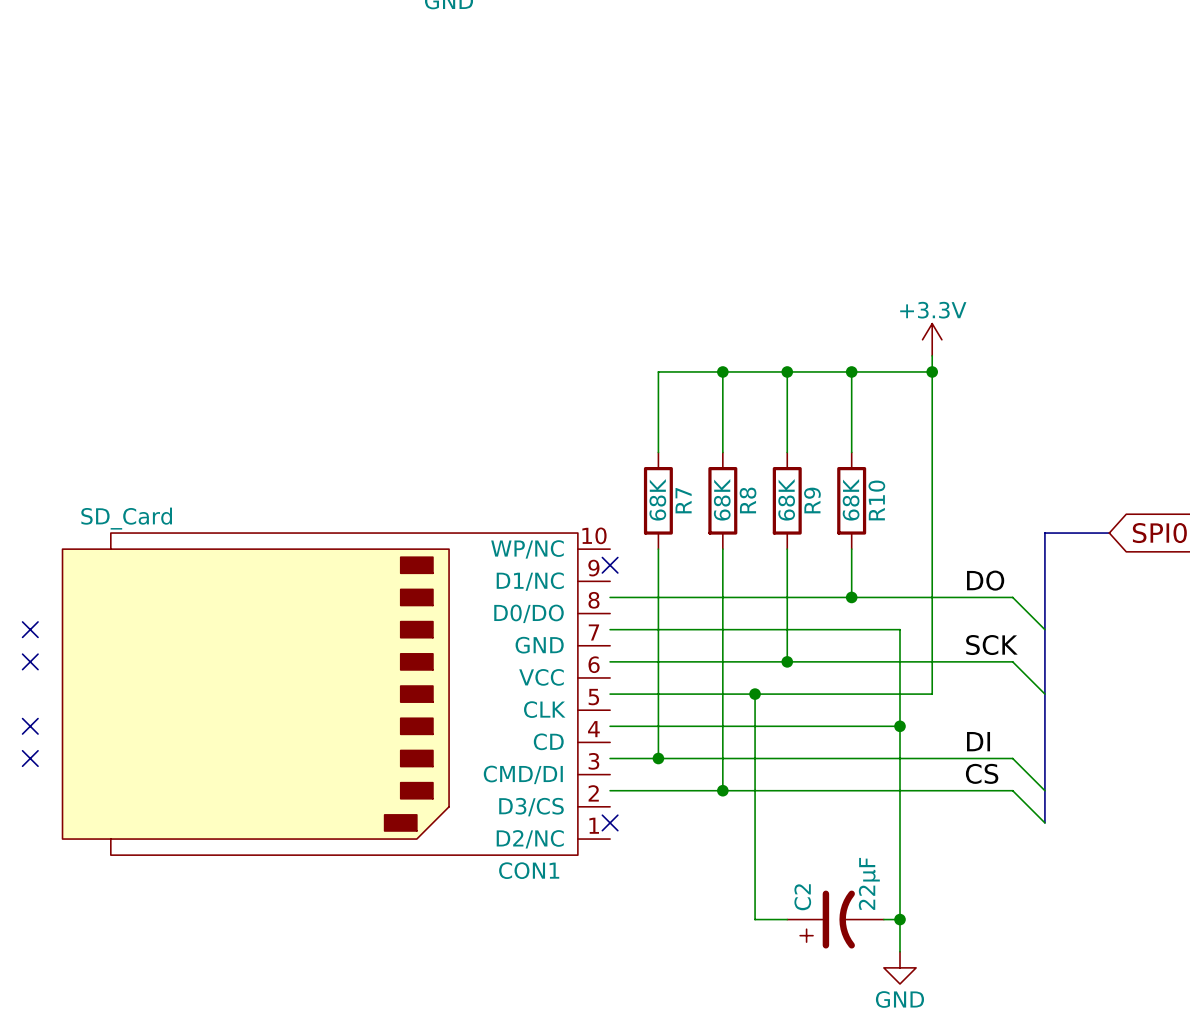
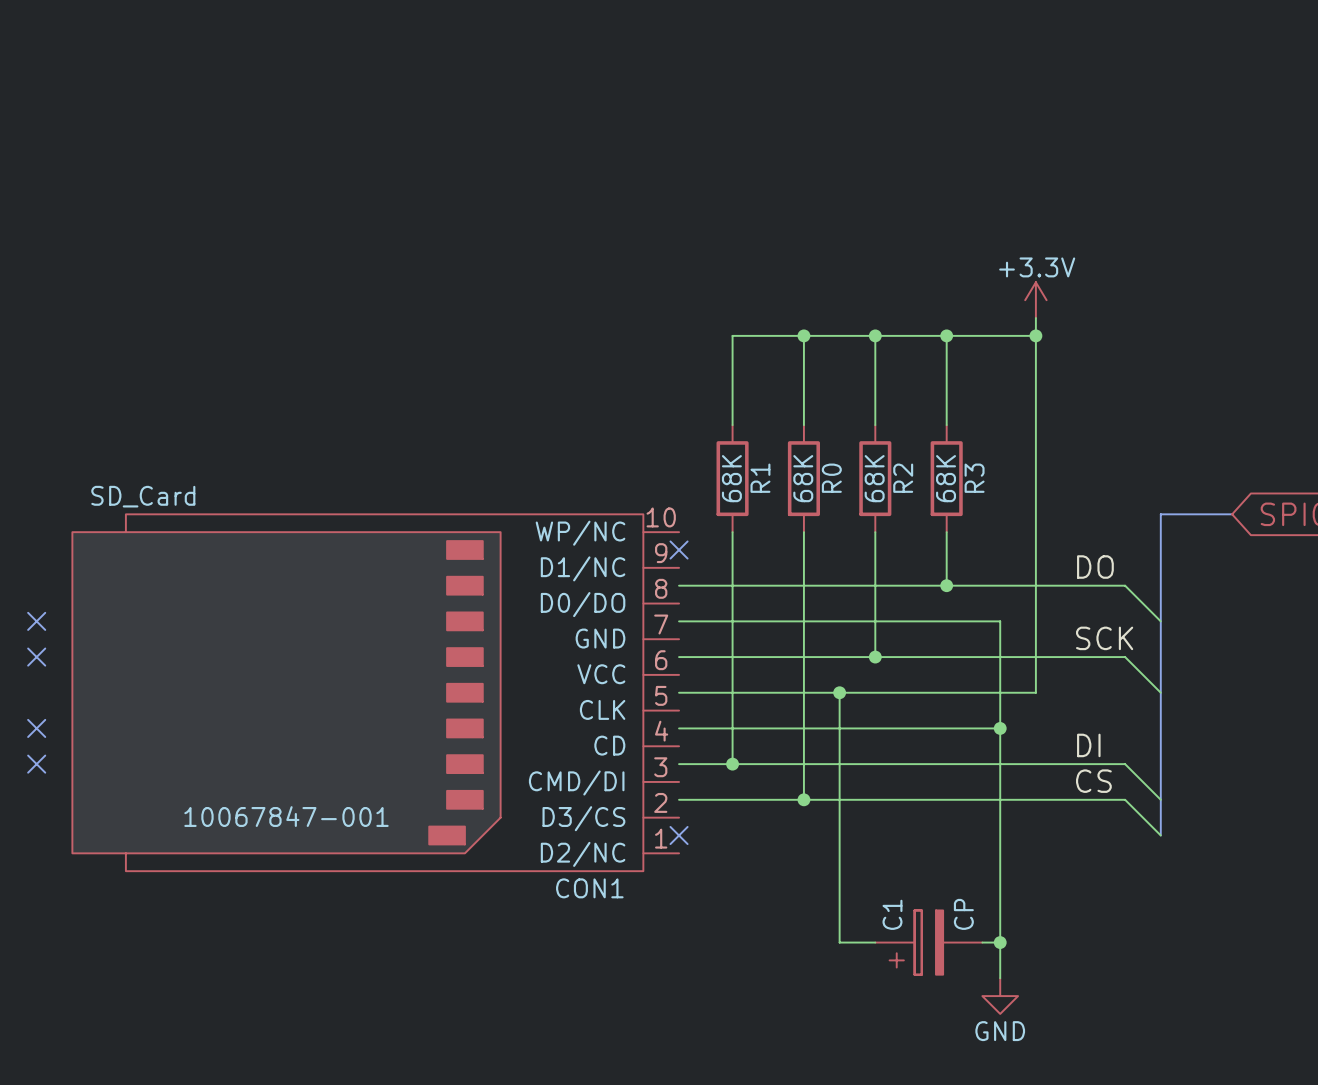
R7 name: R7 (683, 500) -> R1 (760, 478)
R8 name: R8 (748, 500) -> R0 (831, 478)
R9 name: R9 (812, 500) -> R2 (903, 478)
R10 name: R10 (876, 500) -> R3 (974, 478)
CON1 text: none -> 10067847-001 (286, 816)
C2: 22µF (835, 919) -> none
C1: none -> CP (928, 942)

